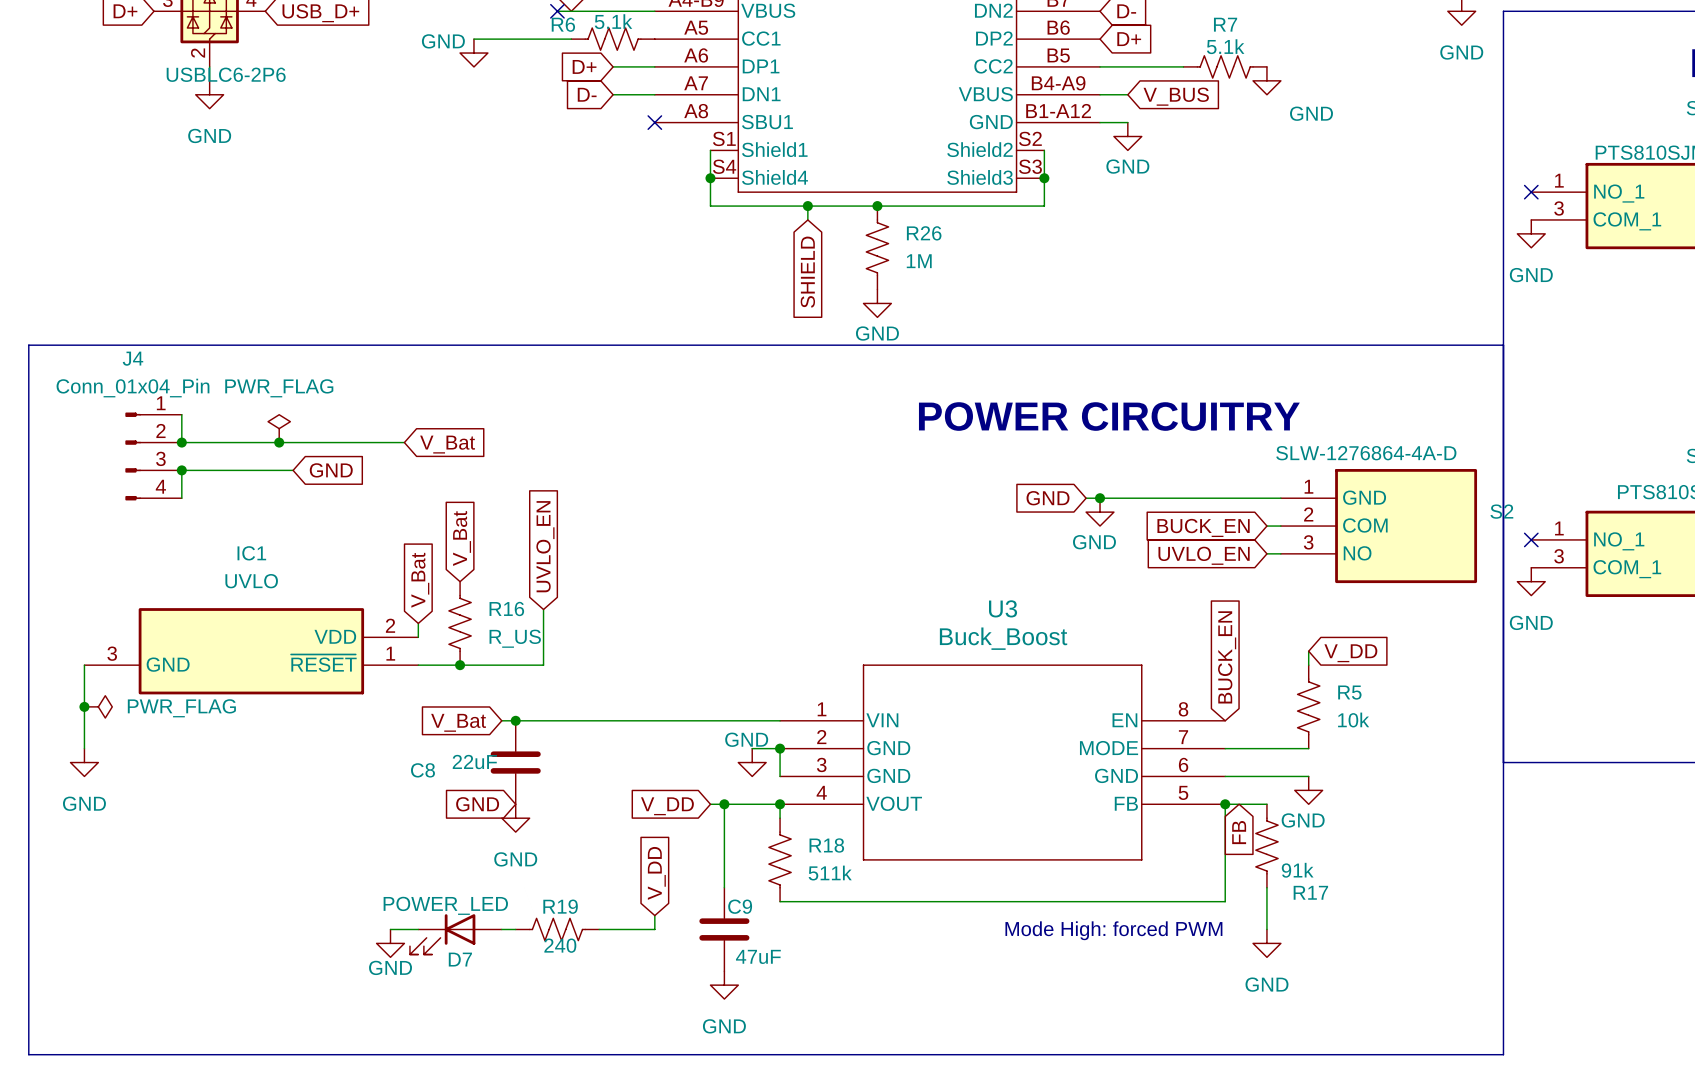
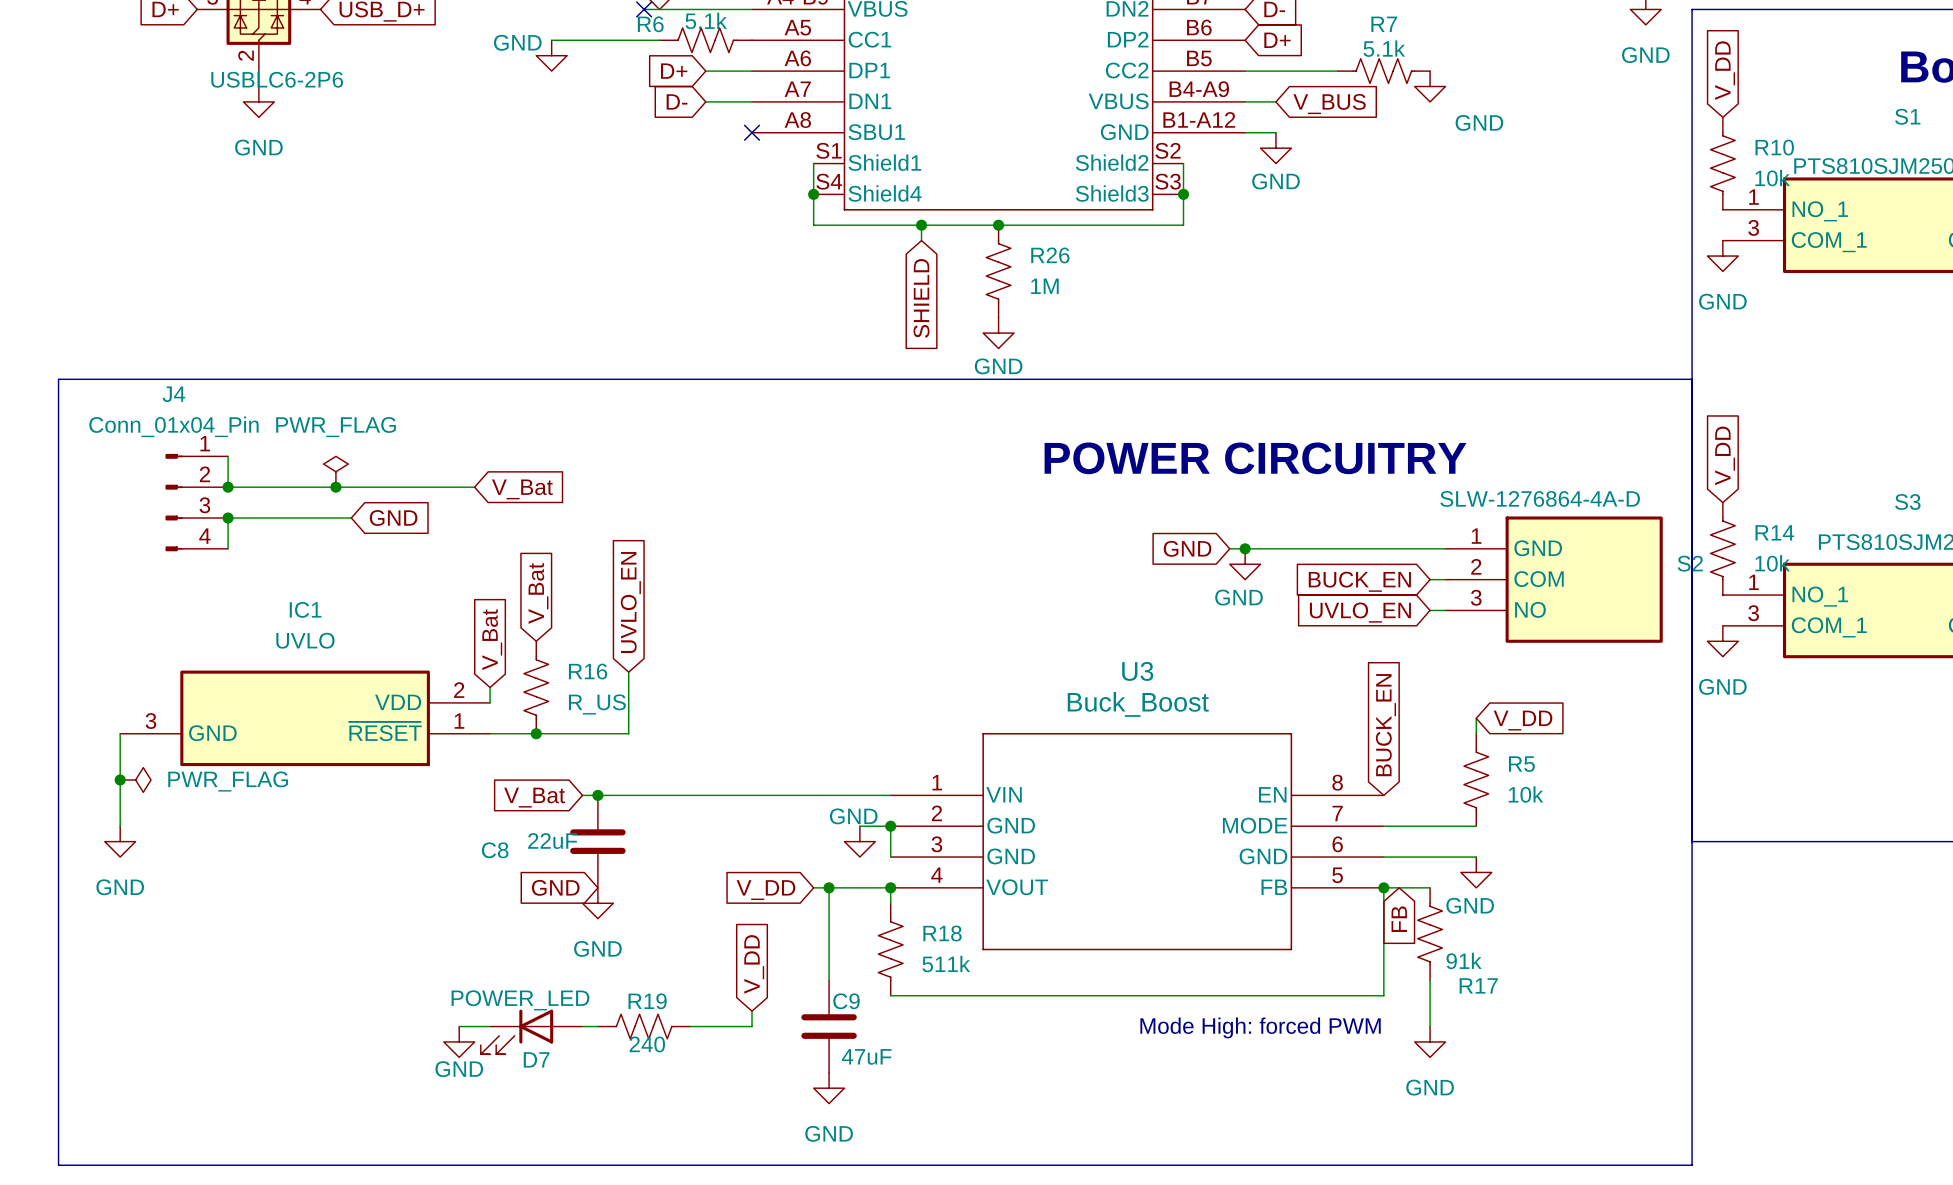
global label: none -> V_DD (1725, 70)
R10: none -> 10k (1722, 163)
no-connect mark: (1531, 192) -> none
global label: none -> V_DD (1725, 455)
R14: none -> 10k (1722, 548)
no-connect mark: (1531, 539) -> none

